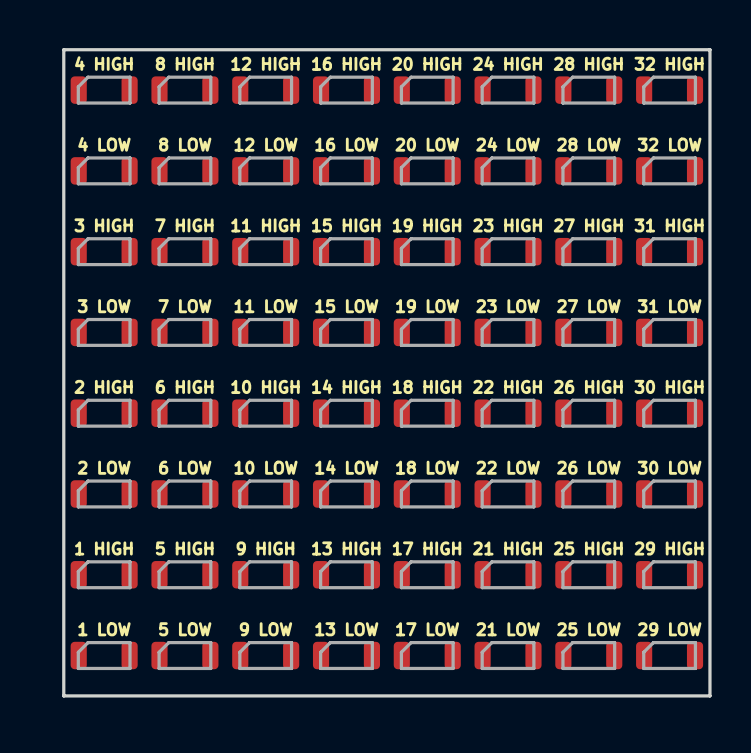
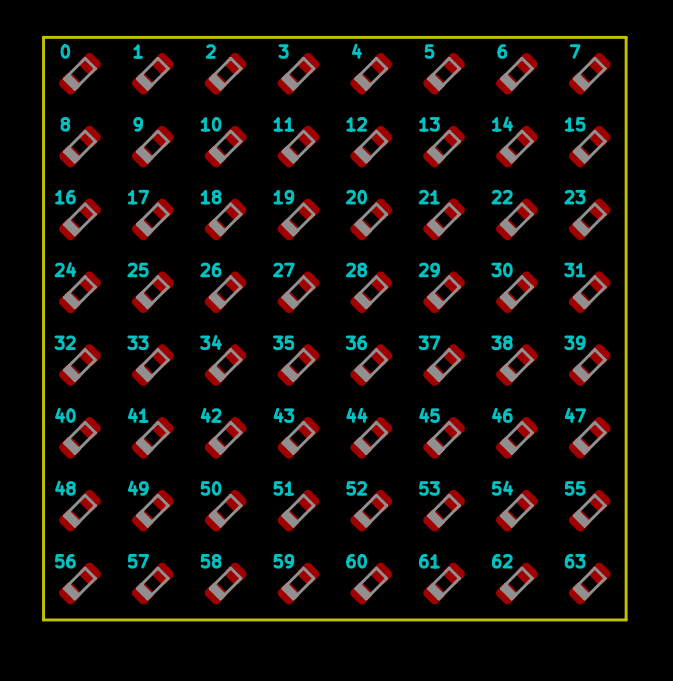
part footprint: [70, 75, 138, 105] -> [59, 52, 101, 95]
part footprint: [151, 75, 219, 105] -> [131, 52, 174, 95]
part footprint: [232, 75, 300, 105] -> [204, 52, 247, 95]
part footprint: [312, 75, 381, 105] -> [277, 52, 320, 95]
part footprint: [393, 75, 461, 105] -> [350, 52, 393, 95]
part footprint: [474, 75, 542, 105] -> [423, 52, 465, 95]
part footprint: [555, 75, 623, 105] -> [495, 52, 538, 95]
part footprint: [636, 75, 704, 105] -> [568, 52, 611, 95]
part footprint: [70, 156, 138, 186] -> [59, 125, 101, 168]
part footprint: [151, 156, 219, 186] -> [131, 125, 174, 168]
part footprint: [232, 156, 300, 186] -> [204, 125, 247, 168]
part footprint: [312, 156, 381, 186] -> [277, 125, 320, 168]
part footprint: [393, 156, 461, 186] -> [350, 125, 393, 168]
part footprint: [474, 156, 542, 186] -> [423, 125, 465, 168]
part footprint: [555, 156, 623, 186] -> [495, 125, 538, 168]
part footprint: [636, 156, 704, 186] -> [568, 125, 611, 168]
part footprint: [70, 237, 138, 267] -> [59, 198, 101, 241]
part footprint: [151, 237, 219, 267] -> [131, 198, 174, 241]
part footprint: [232, 237, 300, 267] -> [204, 198, 247, 241]
part footprint: [312, 237, 381, 267] -> [277, 198, 320, 241]
part footprint: [393, 237, 461, 267] -> [350, 198, 393, 241]
part footprint: [474, 237, 542, 267] -> [423, 198, 465, 241]
part footprint: [555, 237, 623, 267] -> [495, 198, 538, 241]
part footprint: [636, 237, 704, 267] -> [568, 198, 611, 241]
part footprint: [70, 317, 138, 347] -> [59, 271, 101, 314]
part footprint: [151, 317, 219, 347] -> [131, 271, 174, 314]
part footprint: [232, 317, 300, 347] -> [204, 271, 247, 314]
part footprint: [312, 317, 381, 347] -> [277, 271, 320, 314]
part footprint: [393, 317, 461, 347] -> [350, 271, 393, 314]
part footprint: [474, 317, 542, 347] -> [423, 271, 465, 314]
part footprint: [555, 317, 623, 347] -> [495, 271, 538, 314]
part footprint: [636, 317, 704, 347] -> [568, 271, 611, 314]
part footprint: [70, 398, 138, 428] -> [59, 344, 101, 386]
part footprint: [151, 398, 219, 428] -> [131, 344, 174, 386]
part footprint: [232, 398, 300, 428] -> [204, 344, 247, 386]
part footprint: [312, 398, 381, 428] -> [277, 344, 320, 386]
part footprint: [393, 398, 461, 428] -> [350, 344, 393, 386]
part footprint: [474, 398, 542, 428] -> [423, 344, 465, 386]
part footprint: [555, 398, 623, 428] -> [495, 344, 538, 386]
part footprint: [636, 398, 704, 428] -> [568, 344, 611, 386]
part footprint: [70, 479, 138, 509] -> [59, 417, 101, 459]
part footprint: [151, 479, 219, 509] -> [131, 417, 174, 459]
part footprint: [232, 479, 300, 509] -> [204, 417, 247, 459]
part footprint: [312, 479, 381, 509] -> [277, 417, 320, 459]
part footprint: [393, 479, 461, 509] -> [350, 417, 393, 459]
part footprint: [474, 479, 542, 509] -> [423, 417, 465, 459]
part footprint: [555, 479, 623, 509] -> [495, 417, 538, 459]
part footprint: [636, 479, 704, 509] -> [568, 417, 611, 459]
part footprint: [70, 560, 138, 590] -> [59, 489, 101, 532]
part footprint: [151, 560, 219, 590] -> [131, 489, 174, 532]
part footprint: [232, 560, 300, 590] -> [204, 489, 247, 532]
part footprint: [312, 560, 381, 590] -> [277, 489, 320, 532]
part footprint: [393, 560, 461, 590] -> [350, 489, 393, 532]
part footprint: [474, 560, 542, 590] -> [423, 489, 465, 532]
part footprint: [555, 560, 623, 590] -> [495, 489, 538, 532]
part footprint: [636, 560, 704, 590] -> [568, 489, 611, 532]
part footprint: [70, 640, 138, 671] -> [59, 562, 101, 605]
part footprint: [151, 640, 219, 671] -> [131, 562, 174, 605]
part footprint: [232, 640, 300, 671] -> [204, 562, 247, 605]
part footprint: [312, 640, 381, 671] -> [277, 562, 320, 605]
part footprint: [393, 640, 461, 671] -> [350, 562, 393, 605]
part footprint: [474, 640, 542, 671] -> [423, 562, 465, 605]
part footprint: [555, 640, 623, 671] -> [495, 562, 538, 605]
part footprint: [636, 640, 704, 671] -> [568, 562, 611, 605]

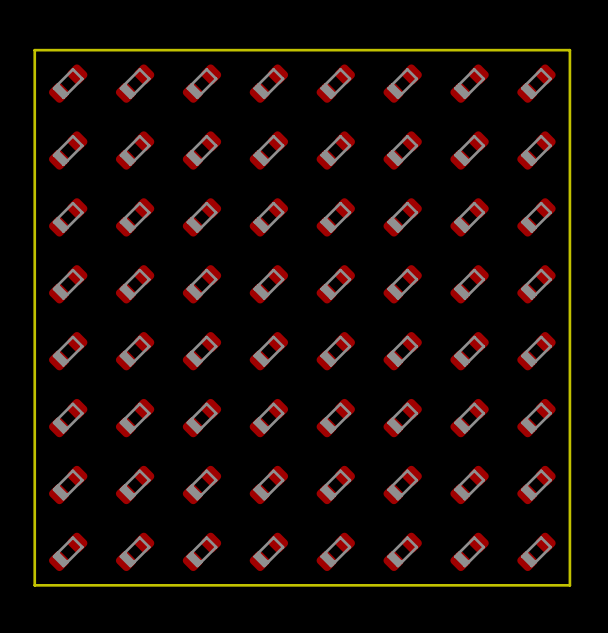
part text: 0 (65, 51) -> none
part text: 1 (138, 51) -> none
part text: 2 (210, 51) -> none
part text: 3 (283, 51) -> none
part text: 4 (356, 51) -> none
part text: 5 (429, 51) -> none
part text: 6 (502, 51) -> none
part text: 7 (575, 51) -> none
part text: 8 (65, 124) -> none
part text: 9 (138, 124) -> none
part text: 10 (211, 124) -> none
part text: 11 (283, 124) -> none
part text: 12 (356, 124) -> none
part text: 13 (429, 124) -> none
part text: 14 (502, 124) -> none
part text: 15 (575, 124) -> none
part text: 16 (65, 197) -> none
part text: 17 (138, 197) -> none
part text: 18 (211, 197) -> none
part text: 19 (283, 197) -> none
part text: 20 (356, 197) -> none
part text: 21 (429, 197) -> none
part text: 22 (502, 197) -> none
part text: 23 (574, 197) -> none
part text: 24 (65, 269) -> none
part text: 25 (137, 269) -> none
part text: 26 (210, 269) -> none
part text: 27 (283, 269) -> none
part text: 28 (356, 269) -> none
part text: 29 (429, 269) -> none
part text: 30 (502, 269) -> none
part text: 31 (574, 269) -> none
part text: 32 (65, 342) -> none
part text: 33 (137, 342) -> none
part text: 34 (211, 342) -> none
part text: 35 (283, 342) -> none
part text: 36 (356, 342) -> none
part text: 37 (429, 342) -> none
part text: 38 (502, 342) -> none
part text: 39 (574, 342) -> none
part text: 40 (65, 415) -> none
part text: 41 (138, 415) -> none
part text: 42 (211, 415) -> none
part text: 43 (283, 415) -> none
part text: 44 (356, 415) -> none
part text: 45 (429, 415) -> none
part text: 46 (502, 415) -> none
part text: 47 (575, 415) -> none
part text: 48 (65, 488) -> none
part text: 49 (138, 488) -> none
part text: 50 (211, 488) -> none
part text: 51 (283, 488) -> none
part text: 52 (356, 488) -> none
part text: 53 (429, 488) -> none
part text: 54 (502, 488) -> none
part text: 55 (575, 488) -> none
part text: 56 (65, 561) -> none
part text: 57 (138, 561) -> none
part text: 58 (211, 561) -> none
part text: 59 (283, 561) -> none
part text: 60 (356, 561) -> none
part text: 61 (429, 561) -> none
part text: 62 (502, 561) -> none
part text: 63 (575, 561) -> none

